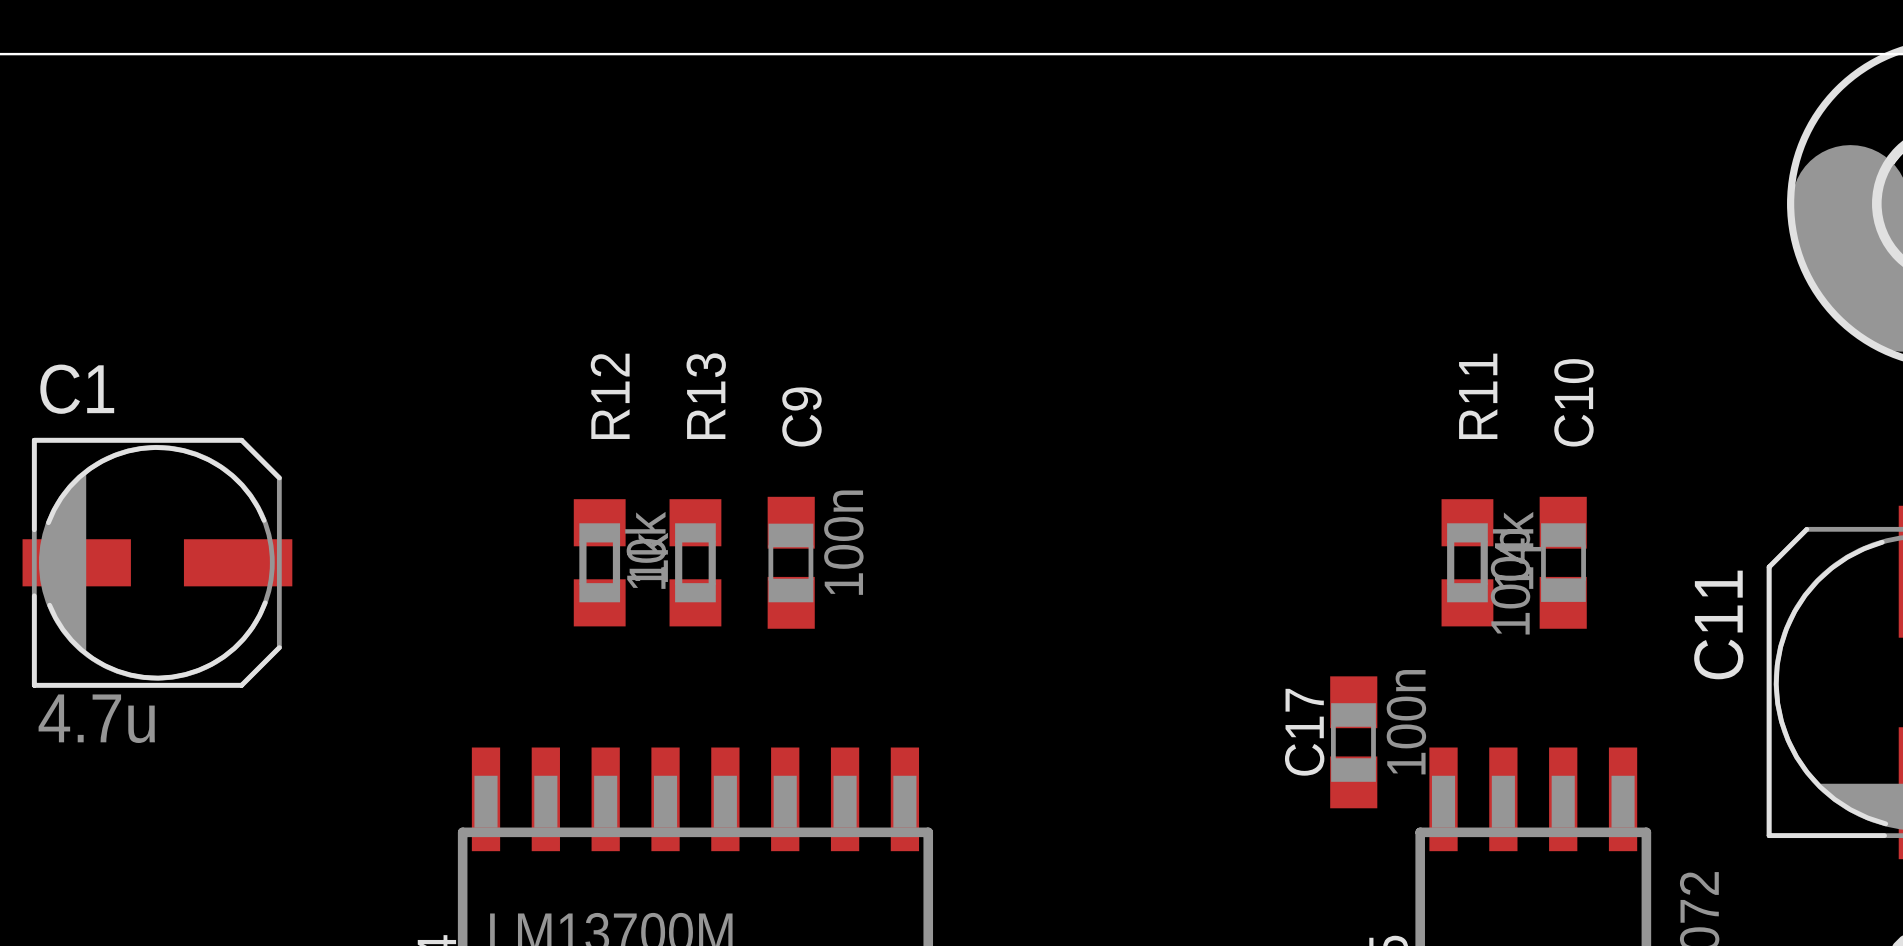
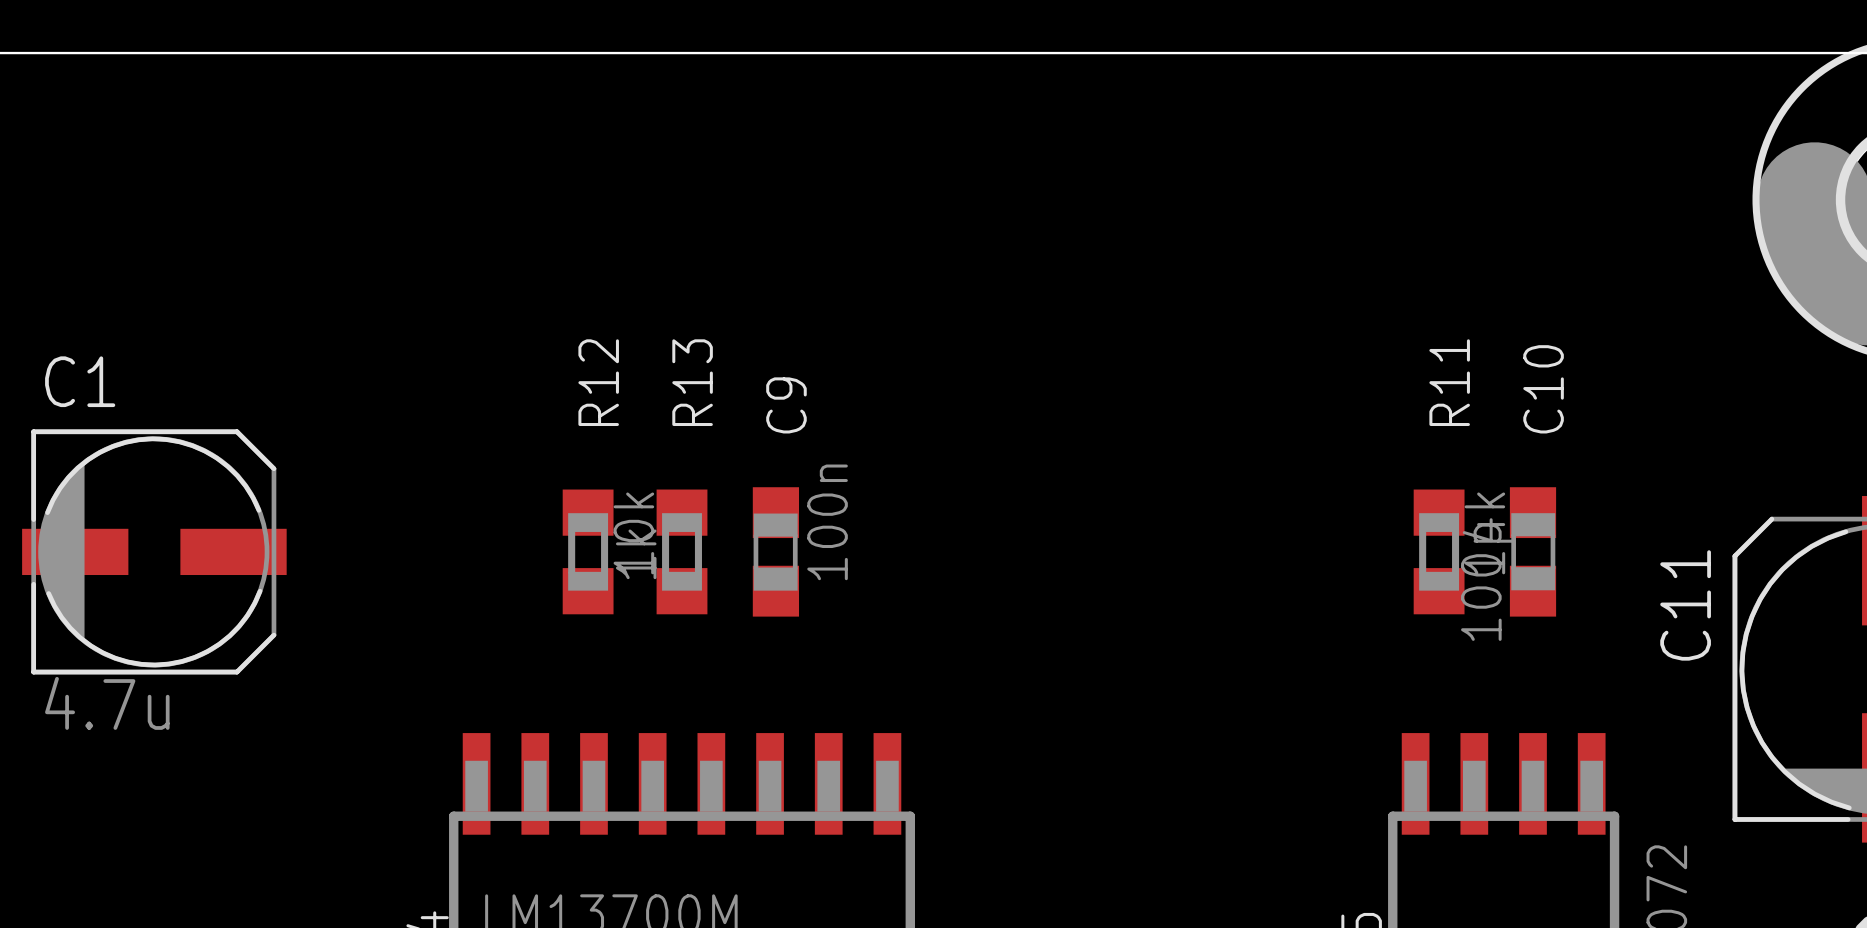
C17: 100n (1353, 742) -> none

